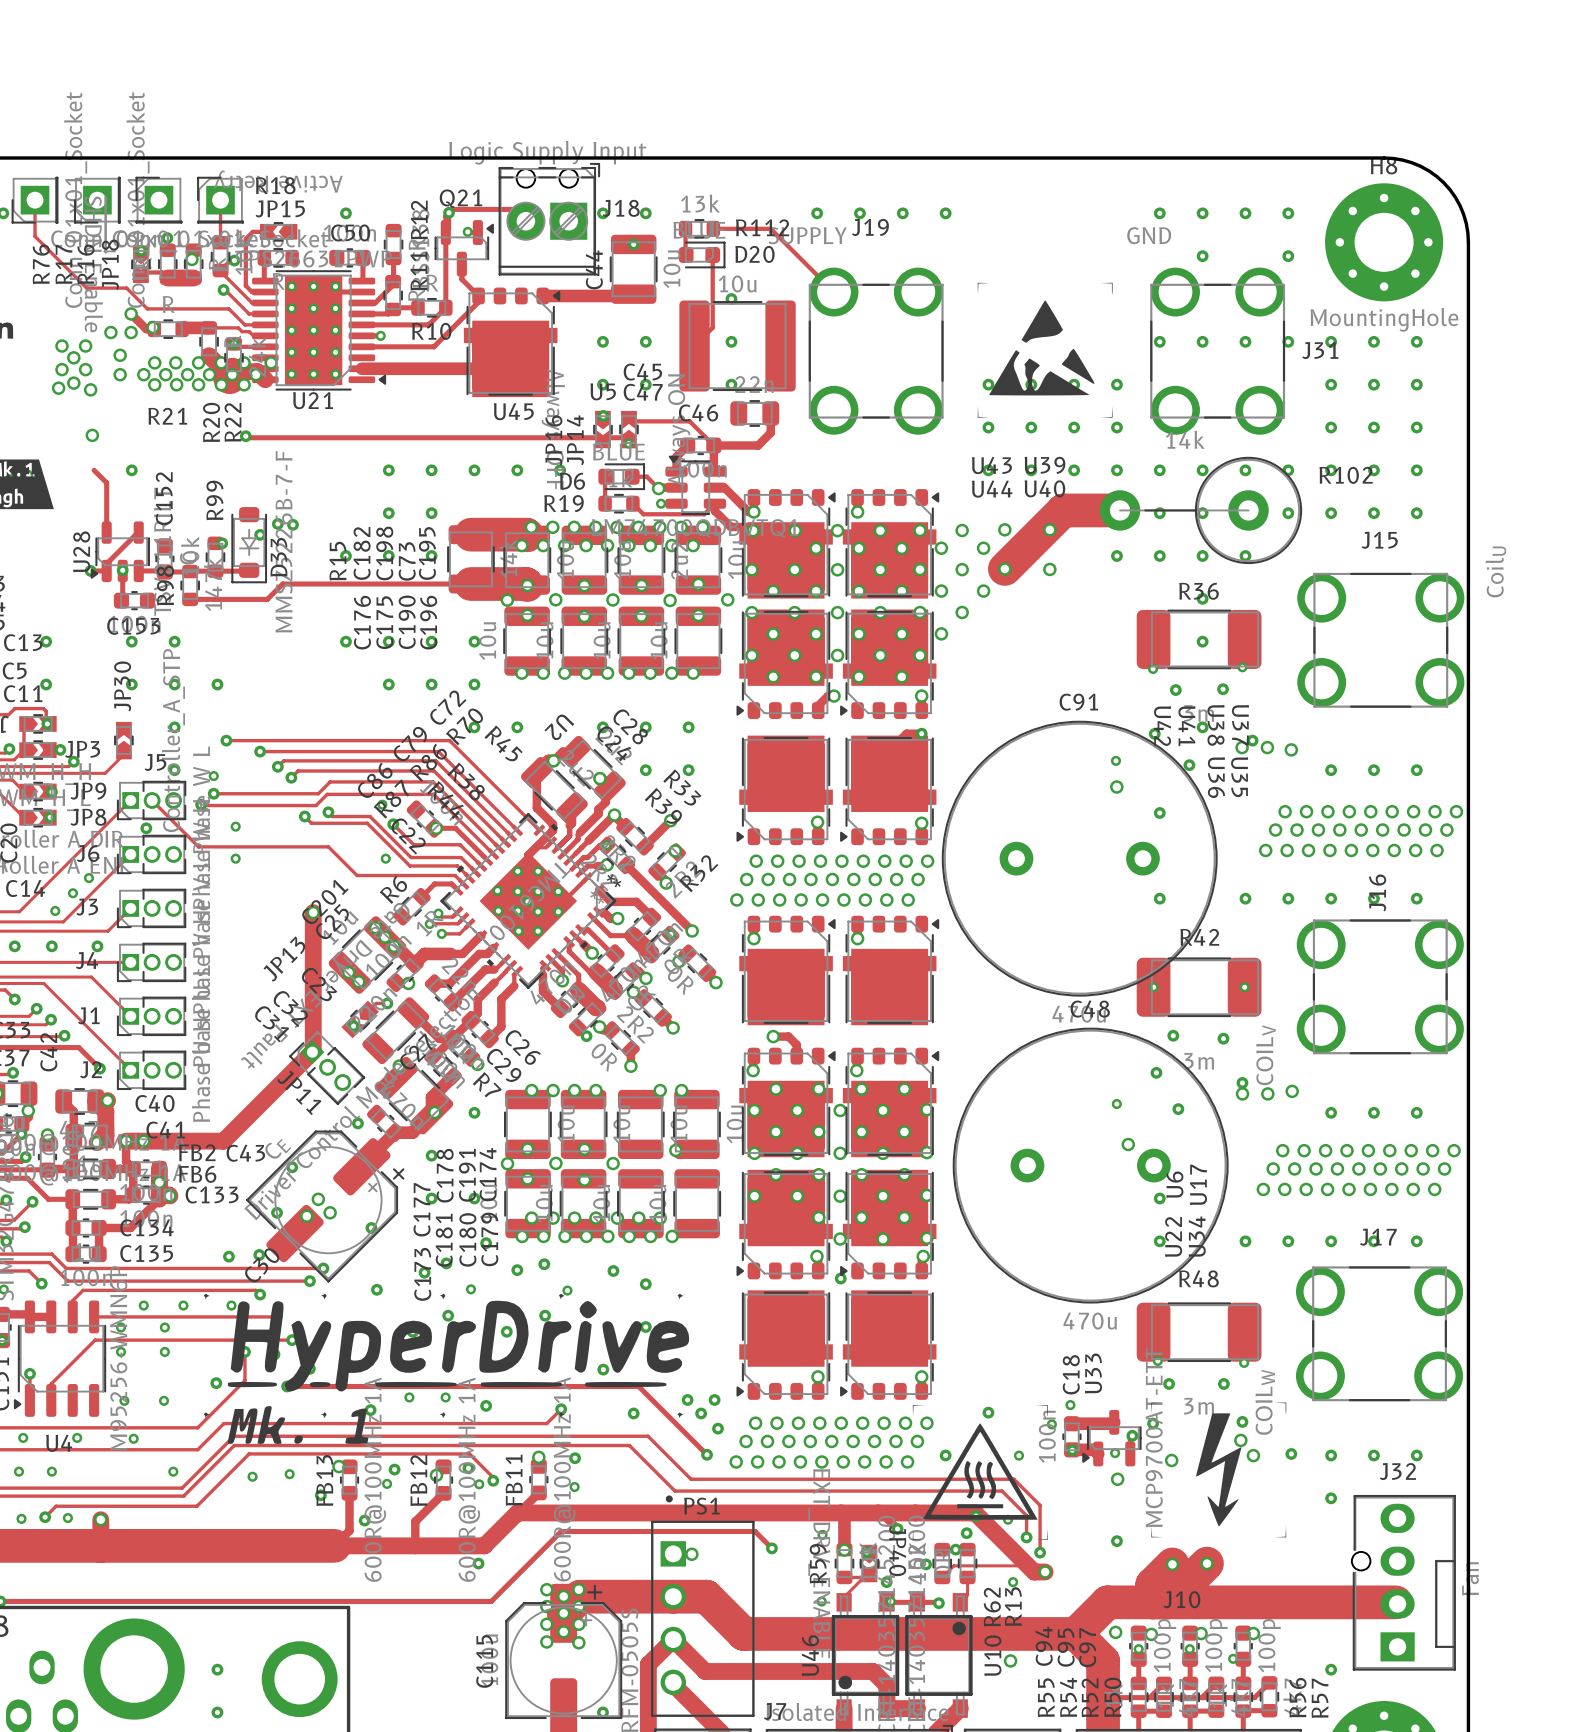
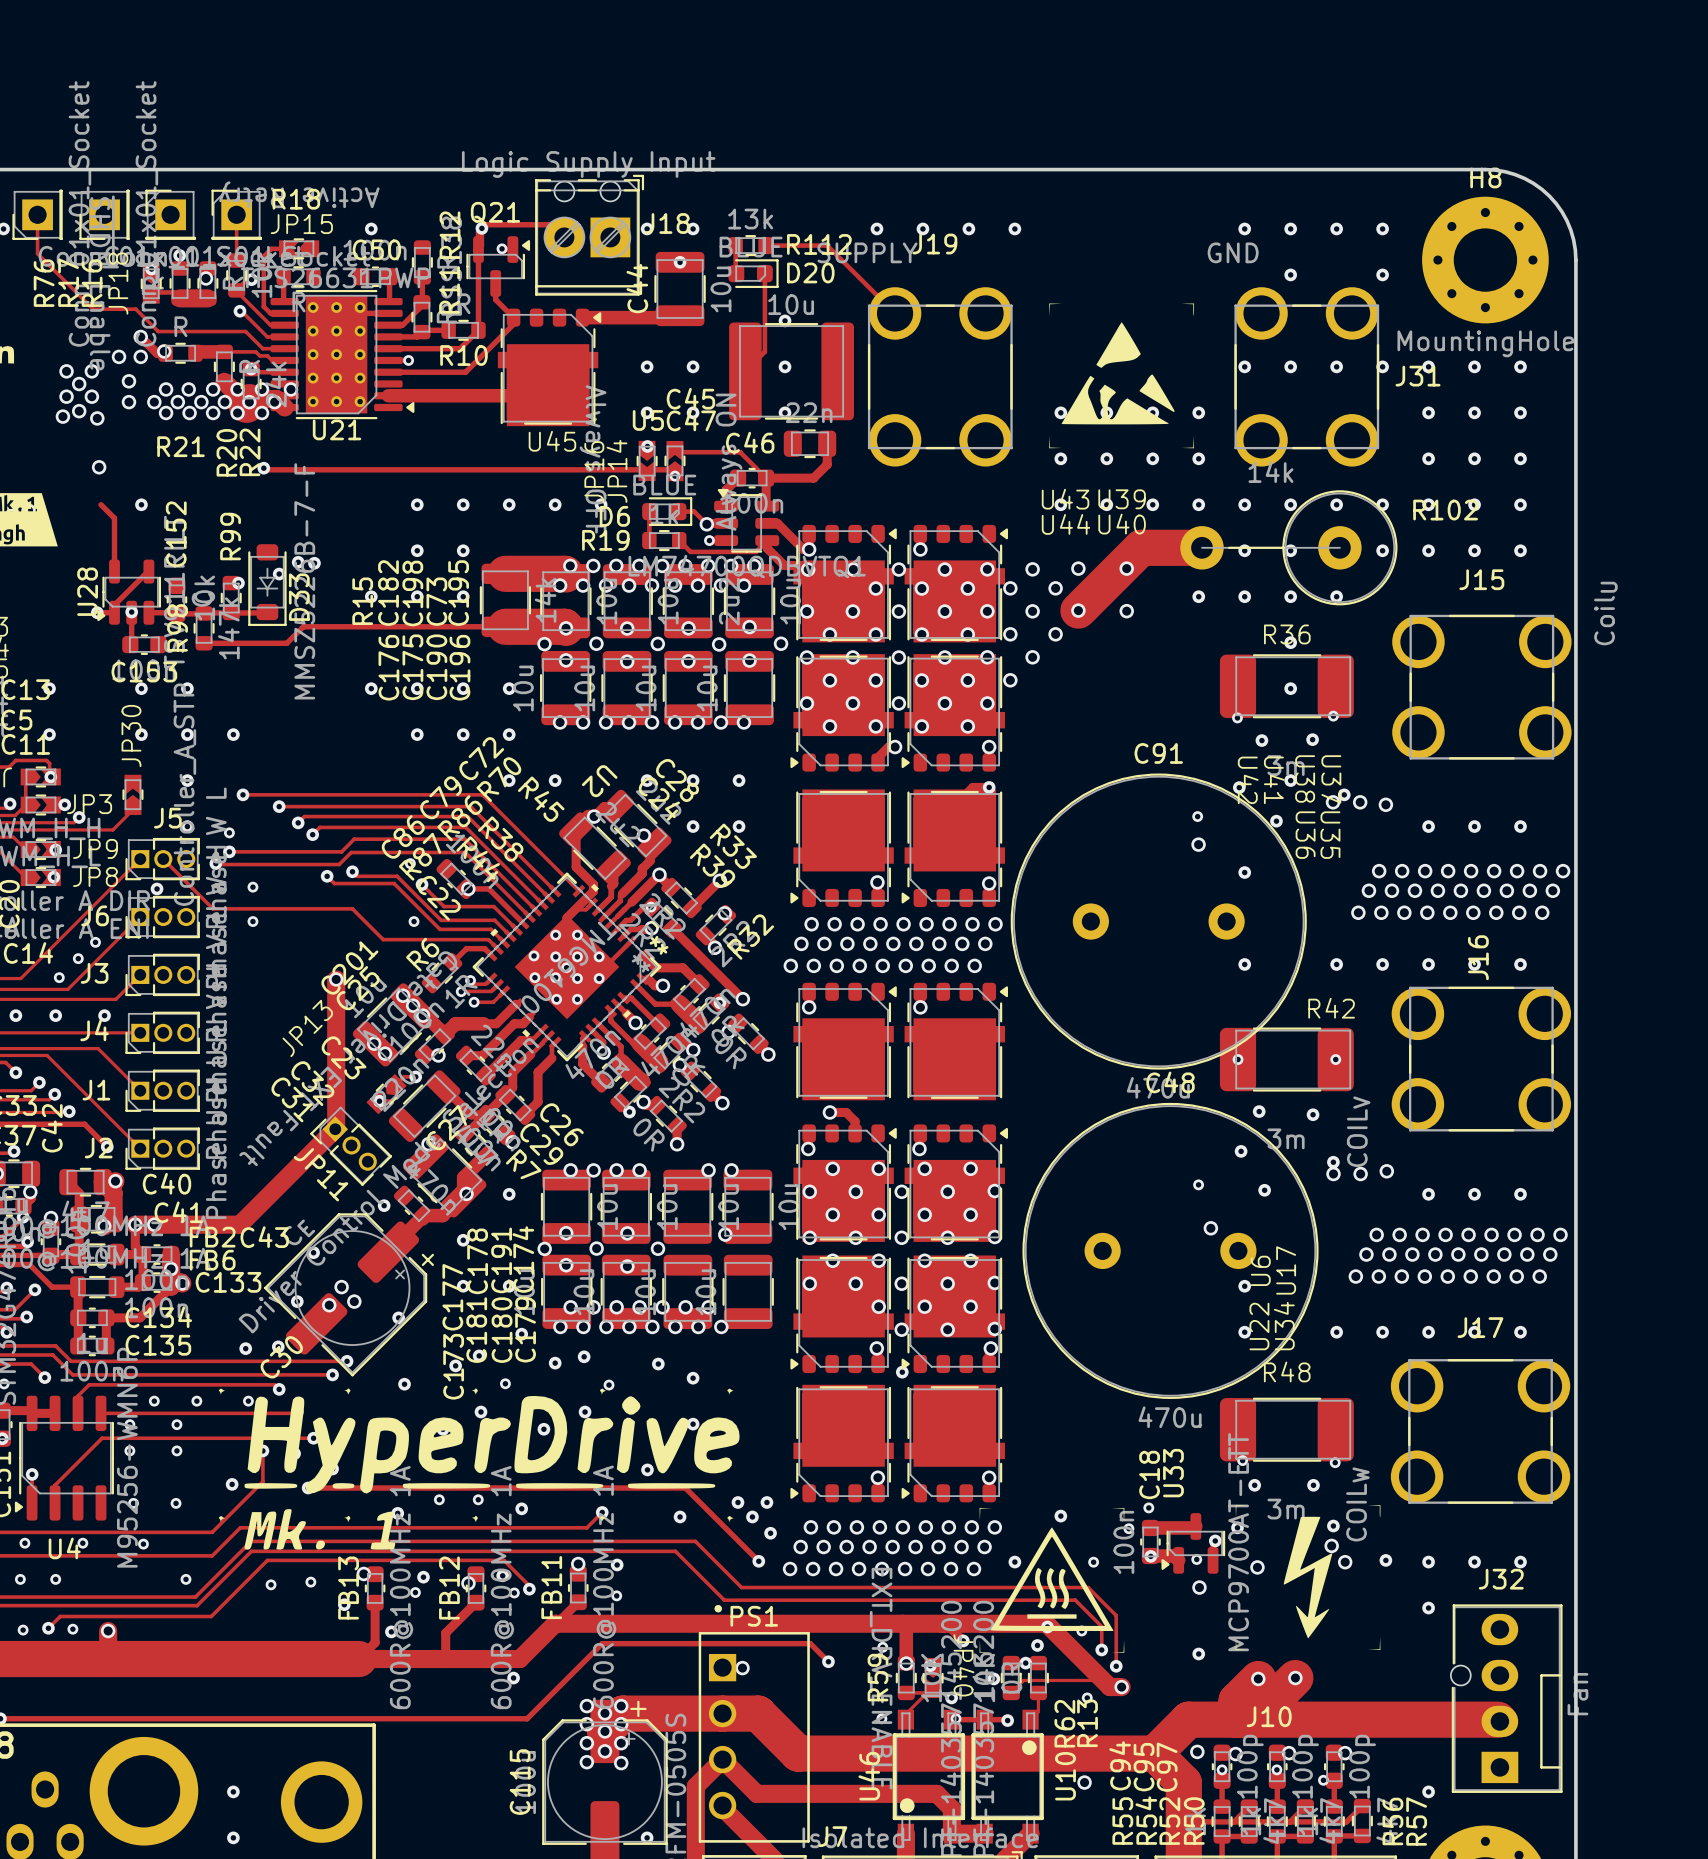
R42 name position: R42 (1199, 937) -> R42 (1331, 1008)

